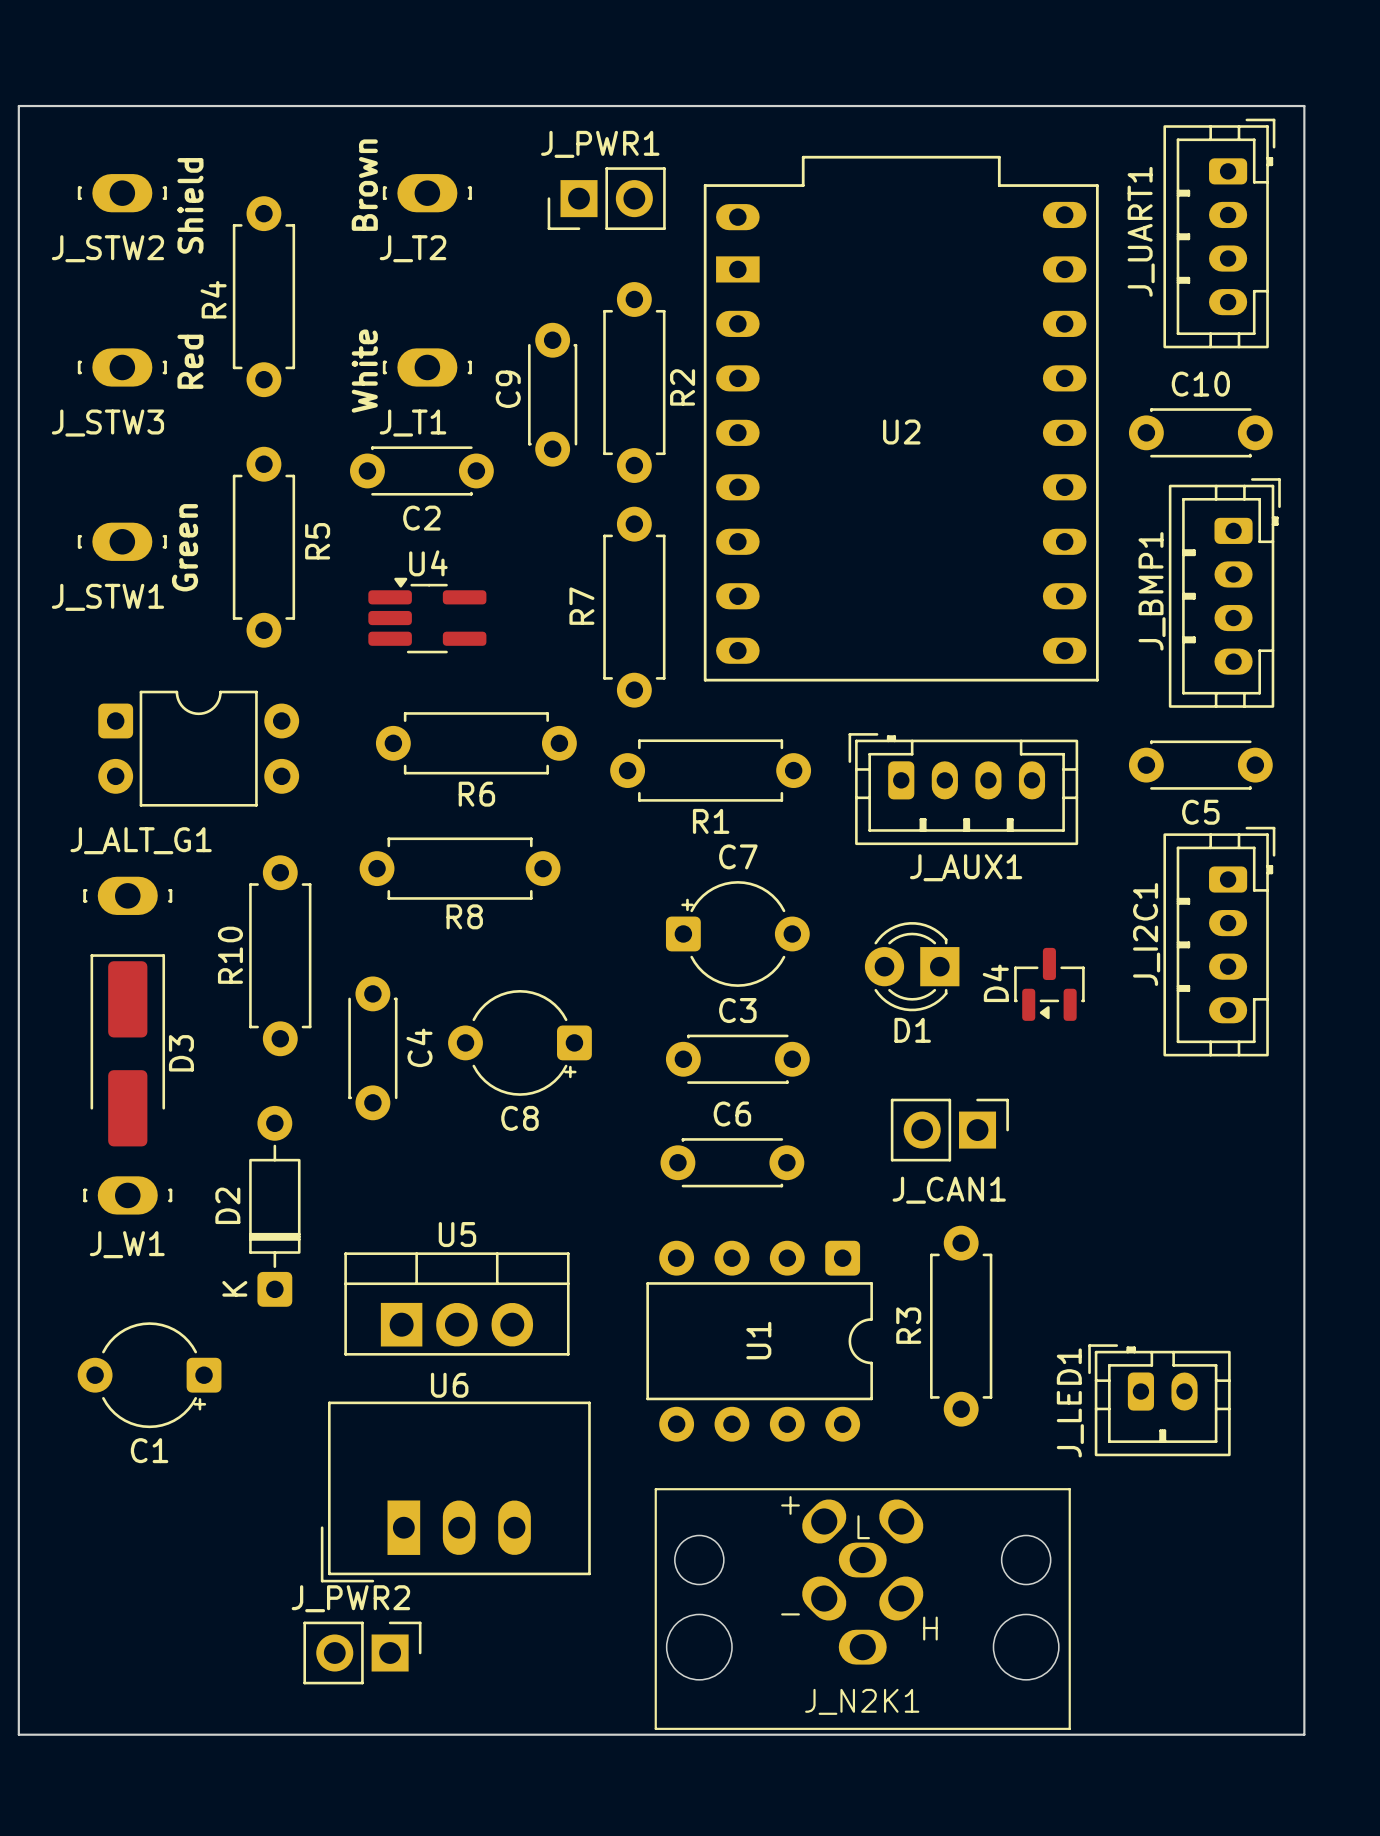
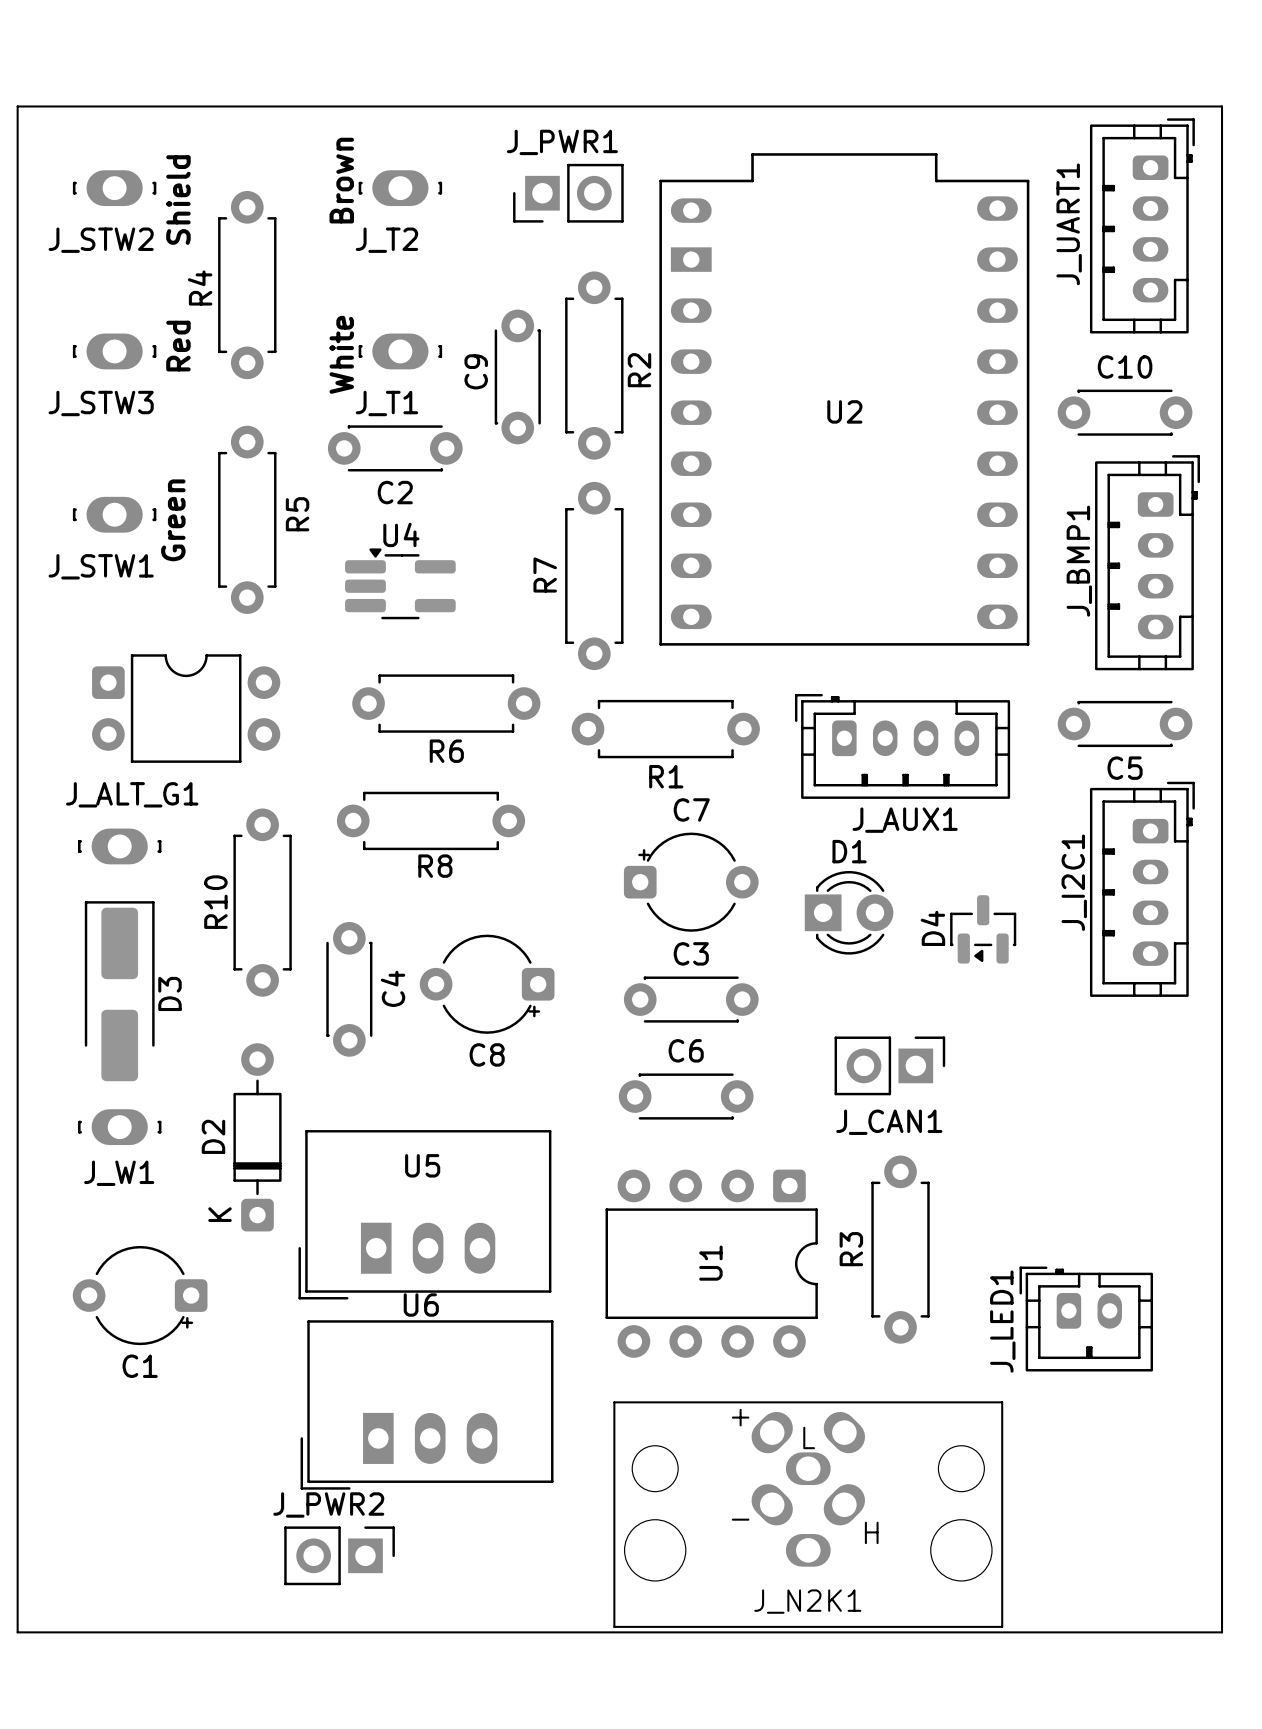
D1 rotation: 0° (912, 966) -> 180° (849, 912)
U5 footprint: [344, 1252, 570, 1356] -> [298, 1130, 552, 1300]

